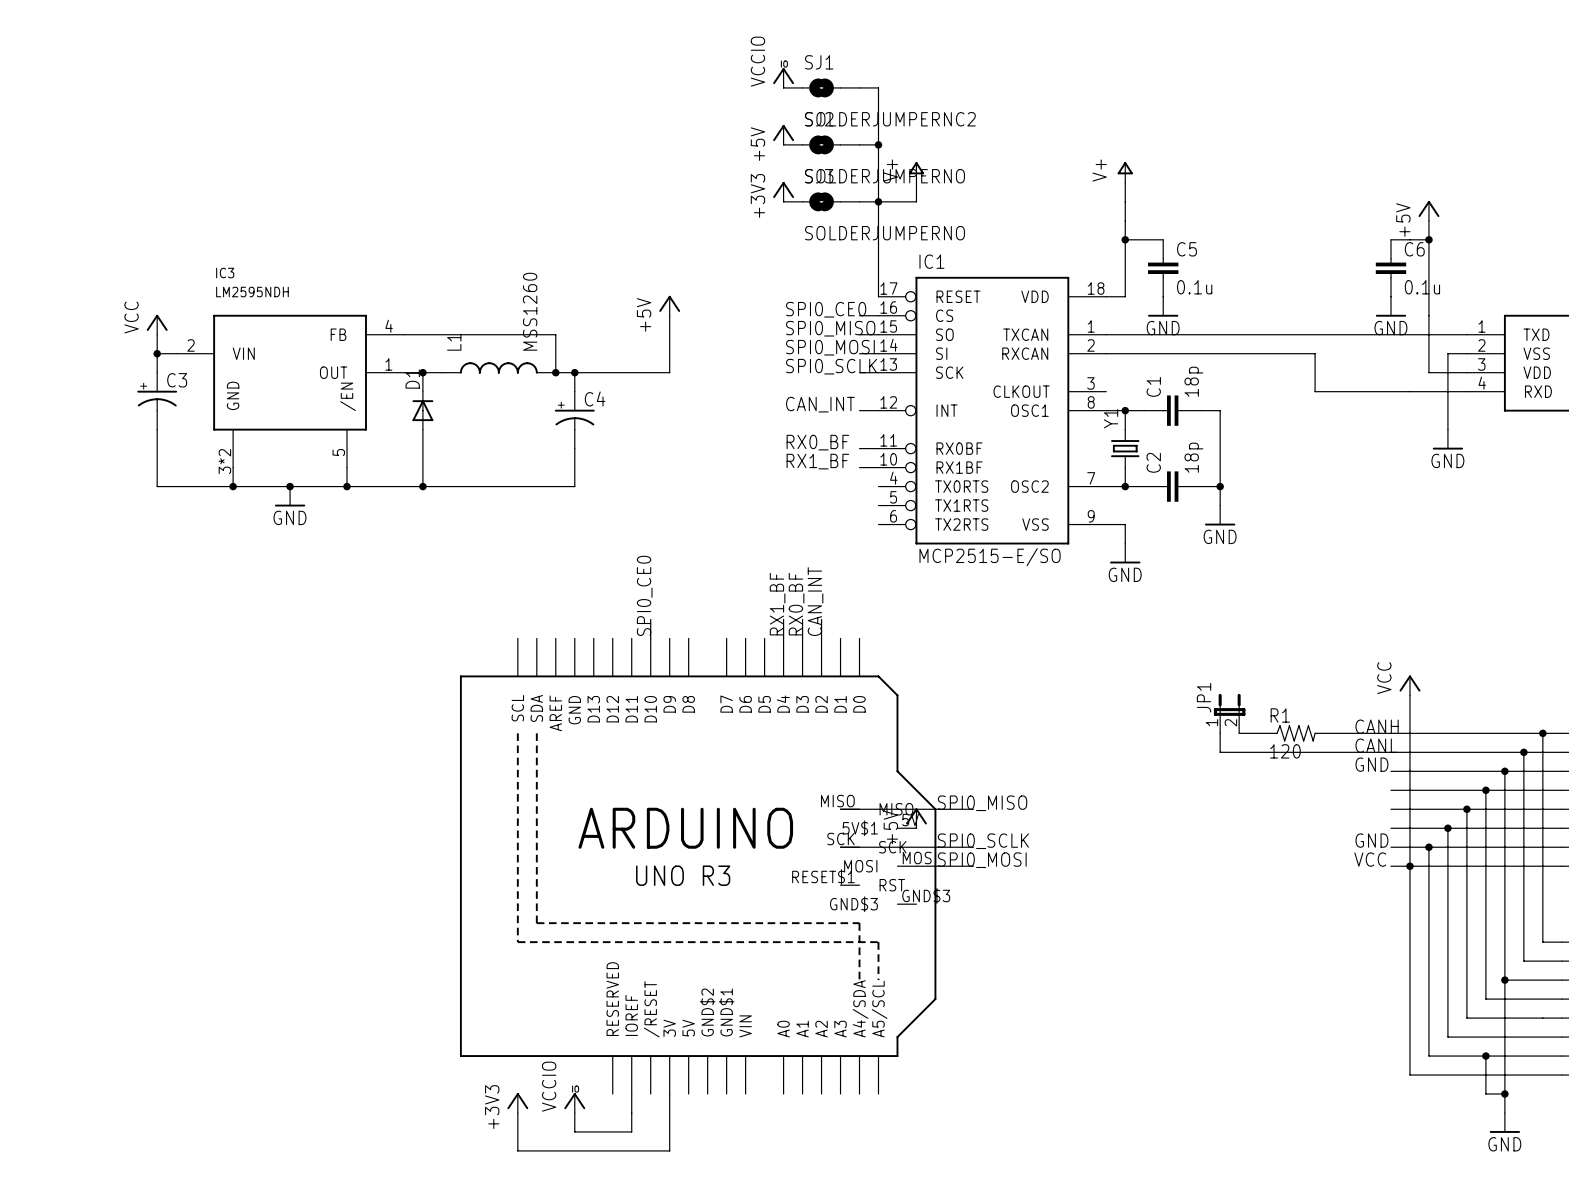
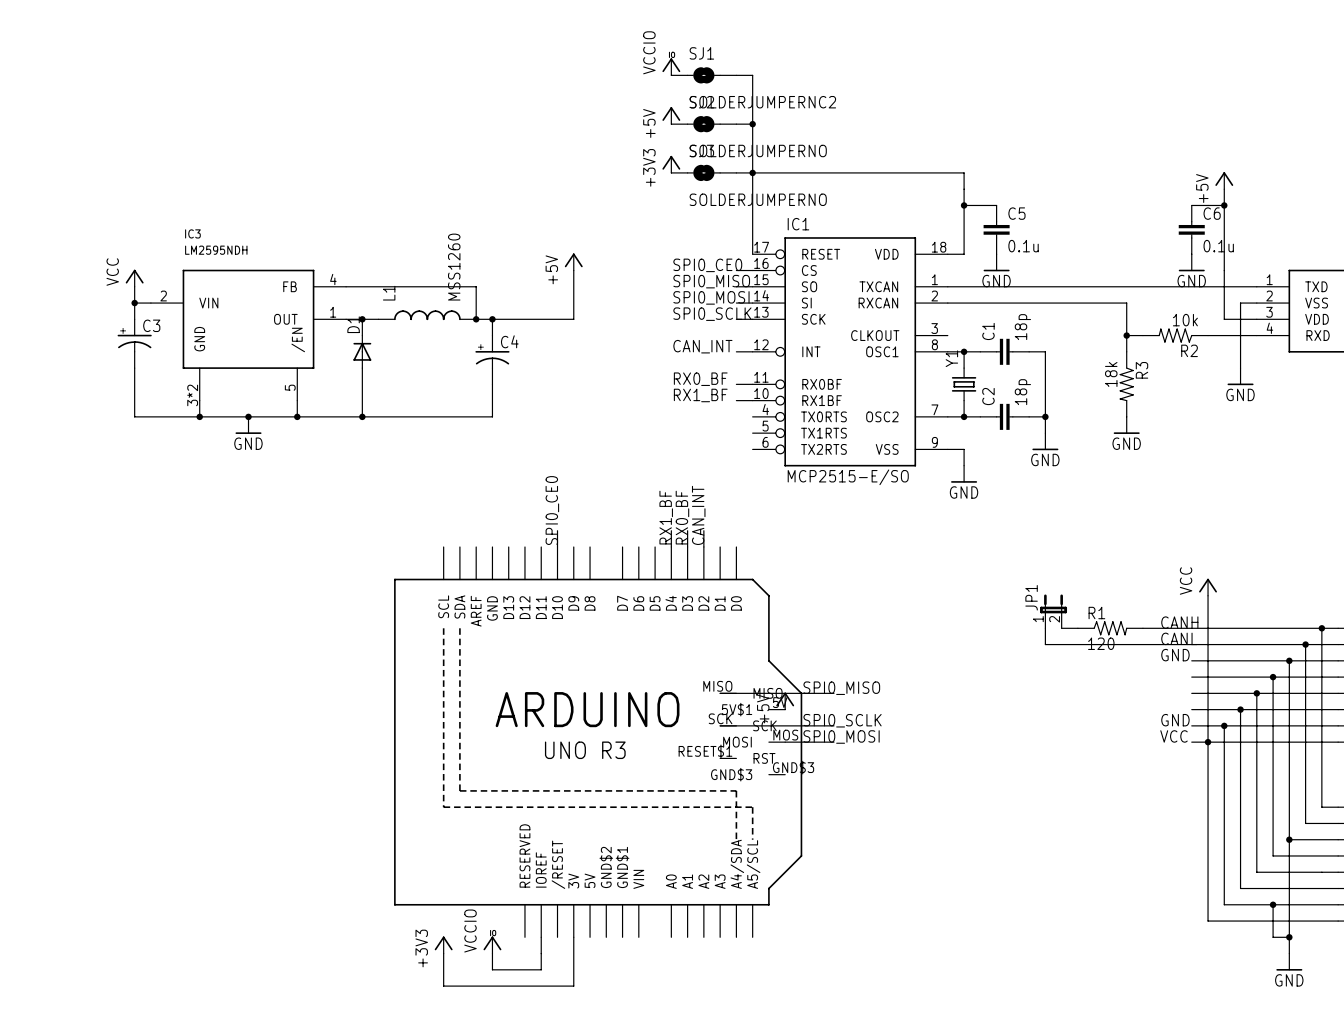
power symbol: V+ (916, 172) -> none
power symbol: V+ (1125, 172) -> none
wire: (916, 182) (916, 201) -> (964, 172) (785, 172)
wire: (1125, 182) (1125, 201) -> none
wire: none -> (1126, 335) (1126, 351)
junction: none -> (1126, 335)
R2: none -> 10k (1175, 335)
R3: none -> 18k (1126, 384)
power symbol: none -> GND (1126, 425)

